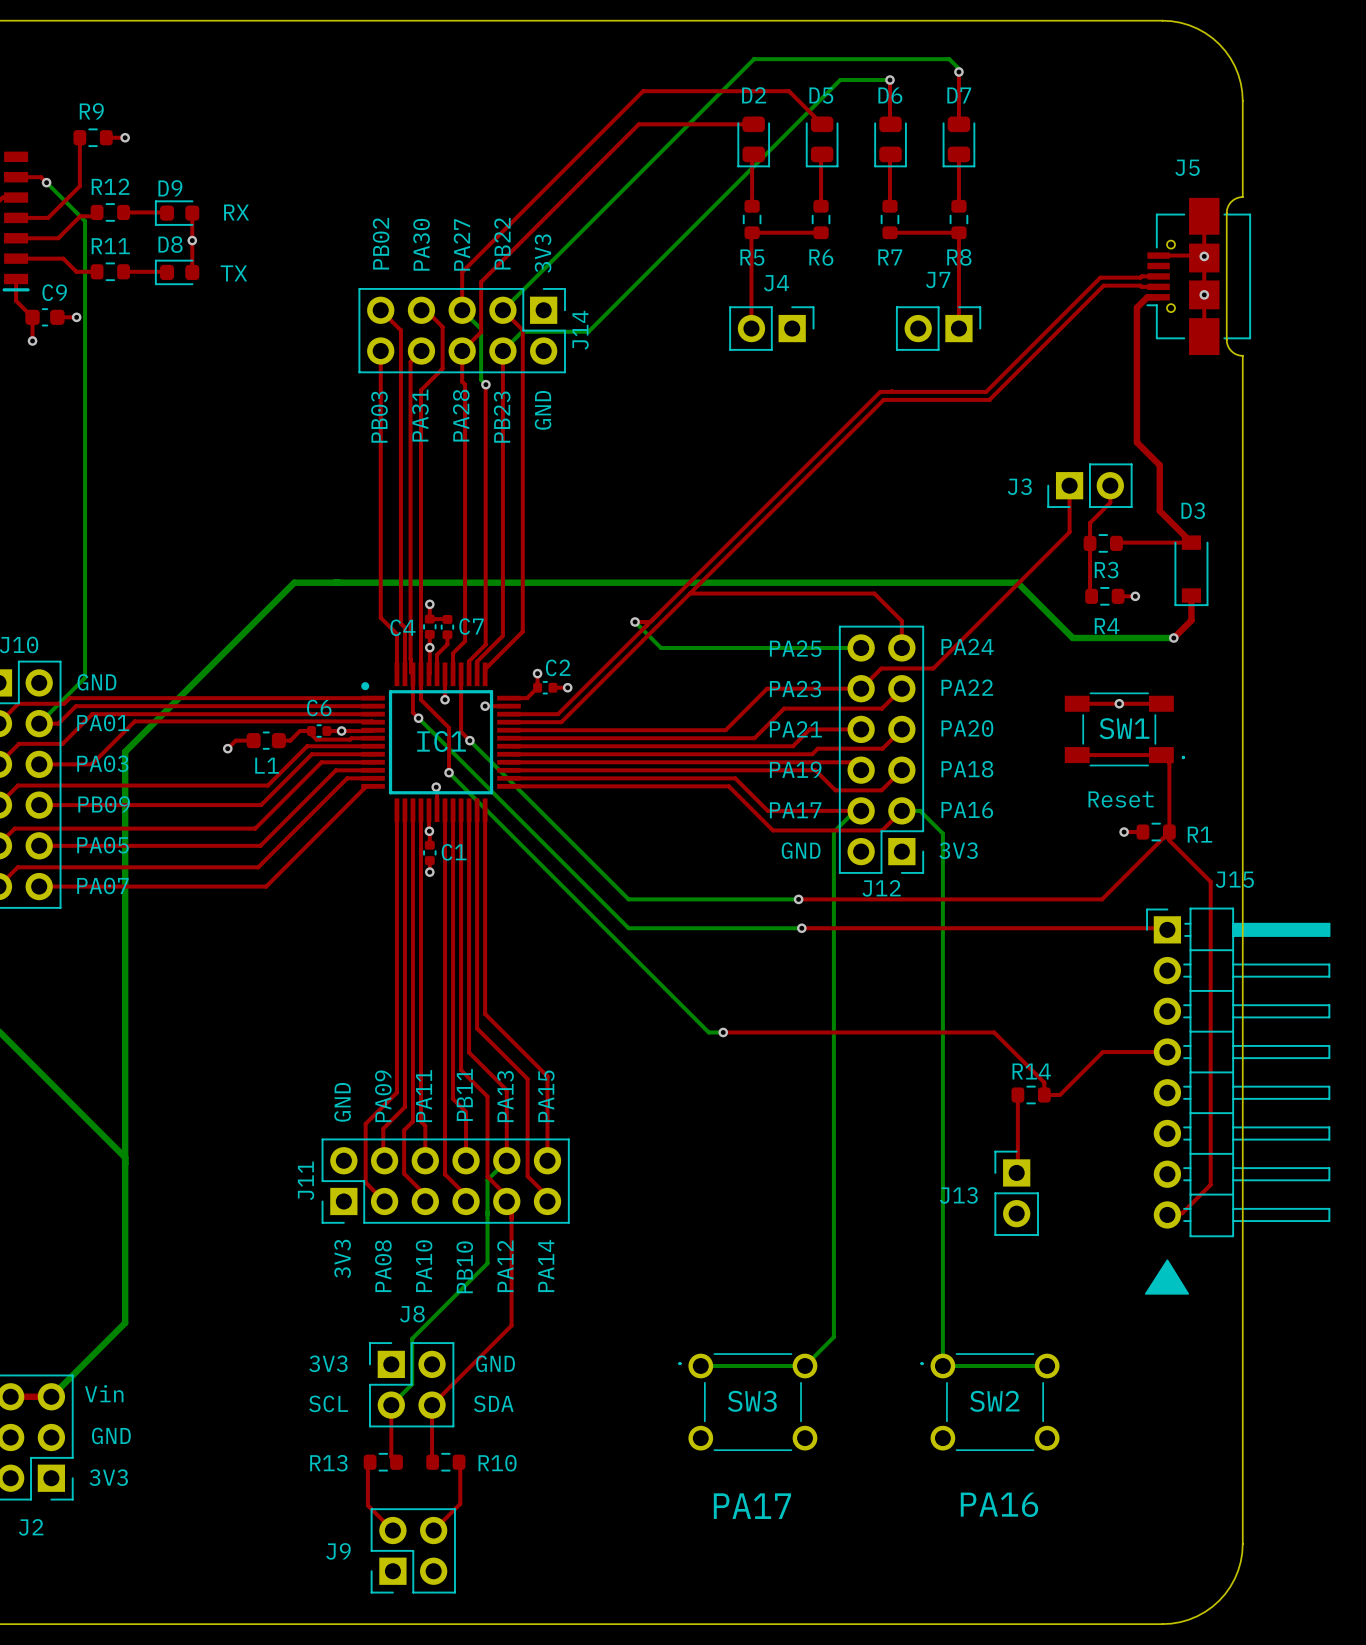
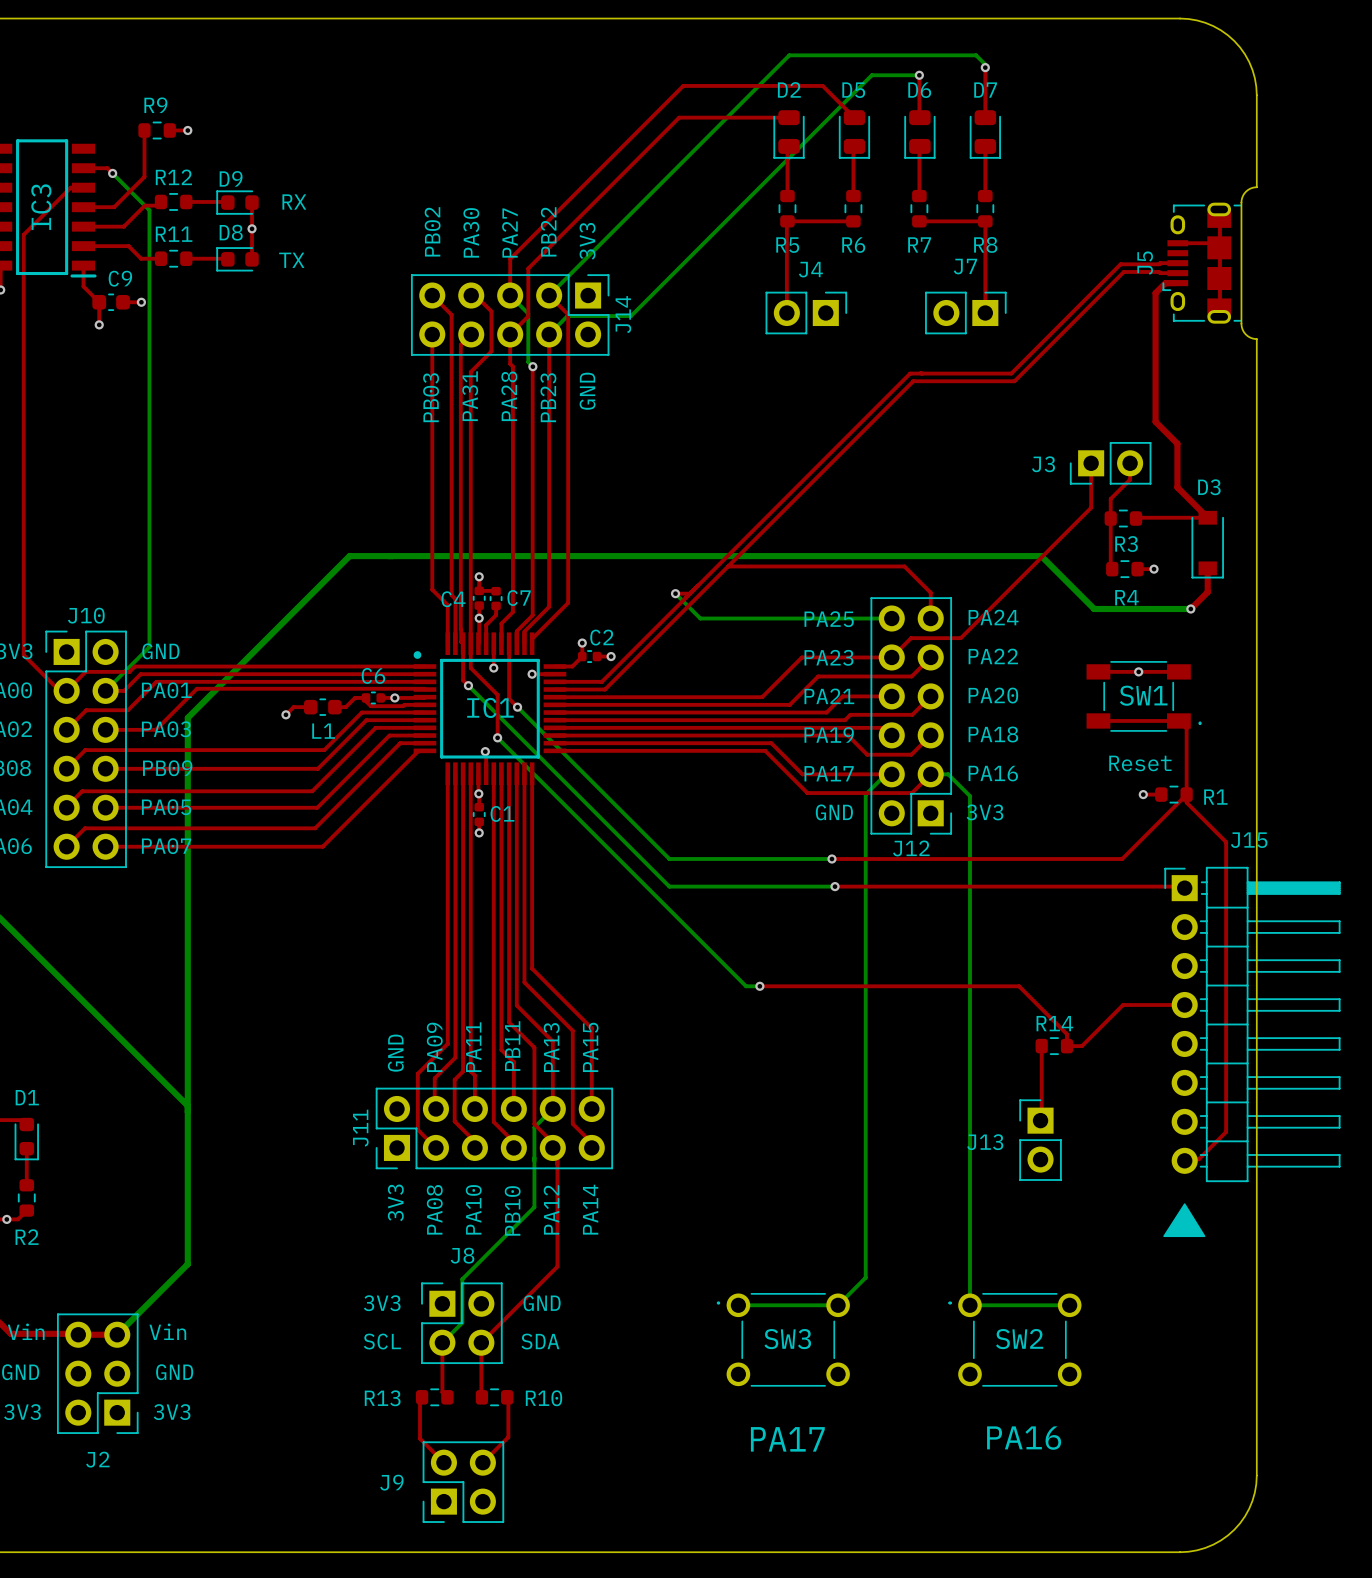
J5 name position: J5 (1187, 167) -> J5 (1145, 263)
J5 footprint: [1146, 197, 1252, 356] -> [1162, 202, 1242, 324]
via: (1204, 256) -> none
via: (1204, 294) -> none

